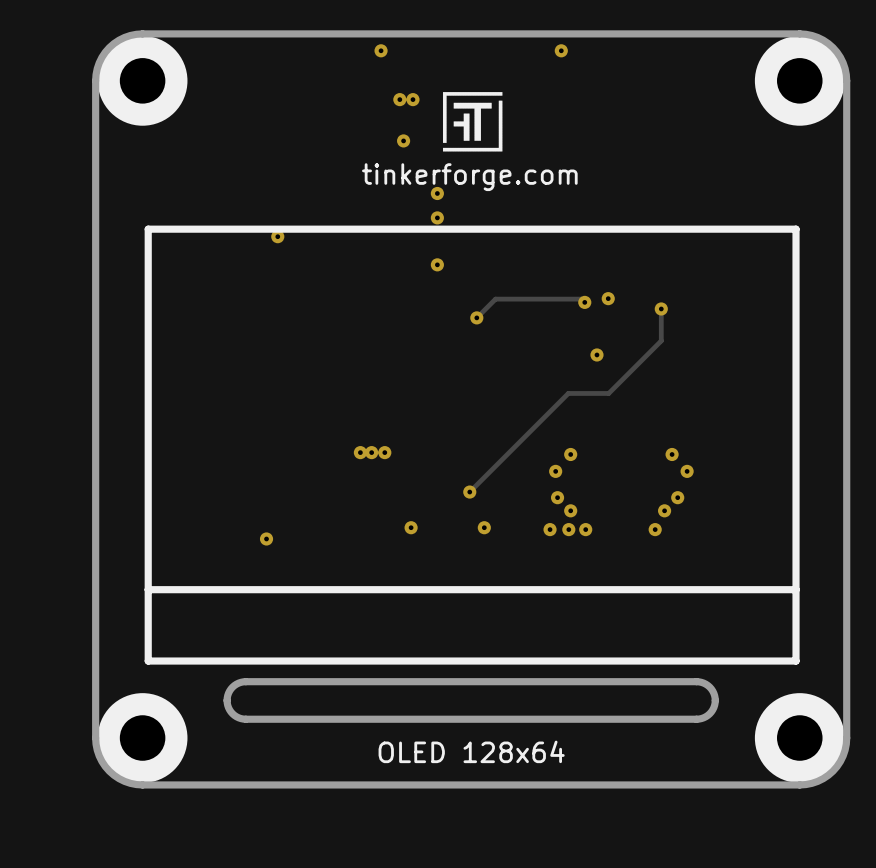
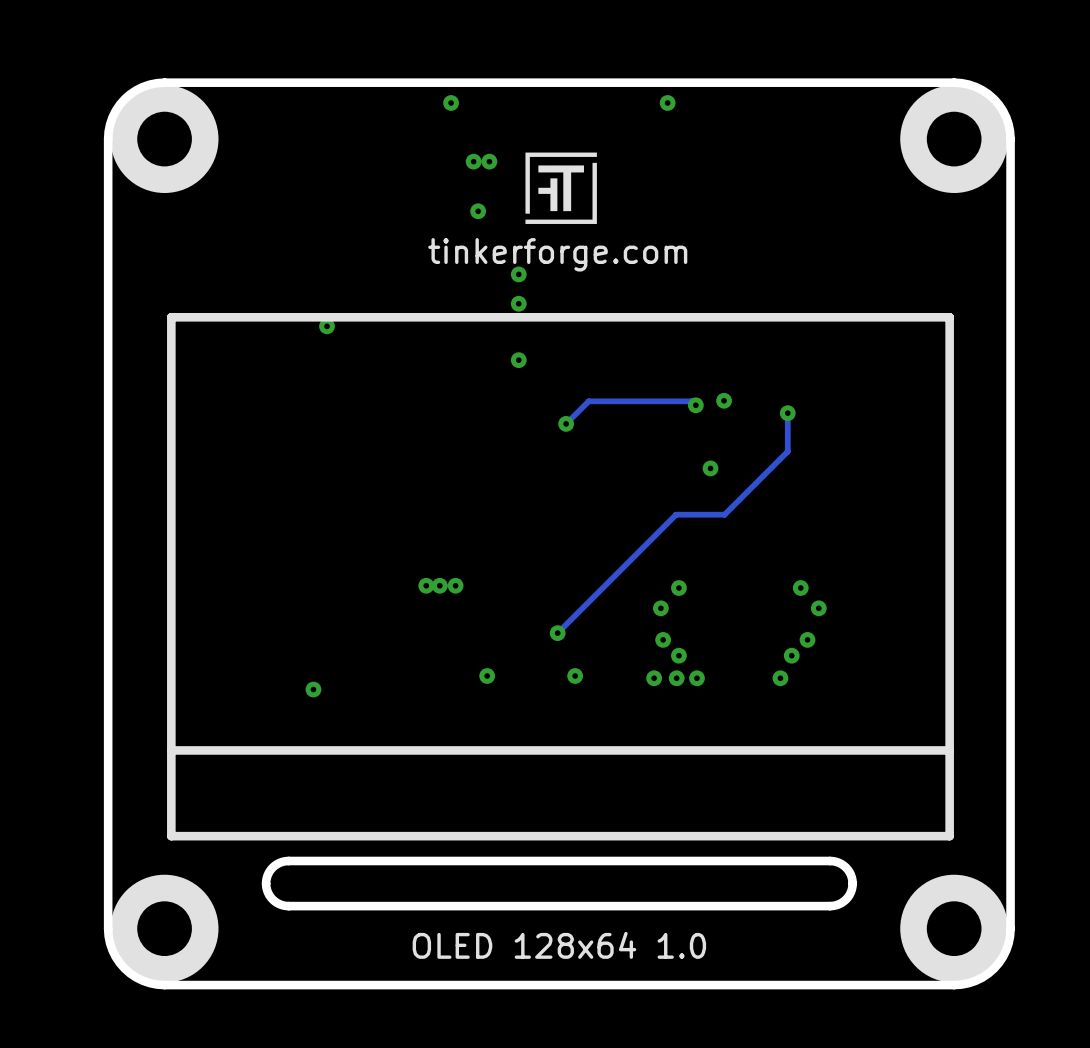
text: OLED 128x64 (471, 751) -> OLED 128x64 1.0 (559, 945)

